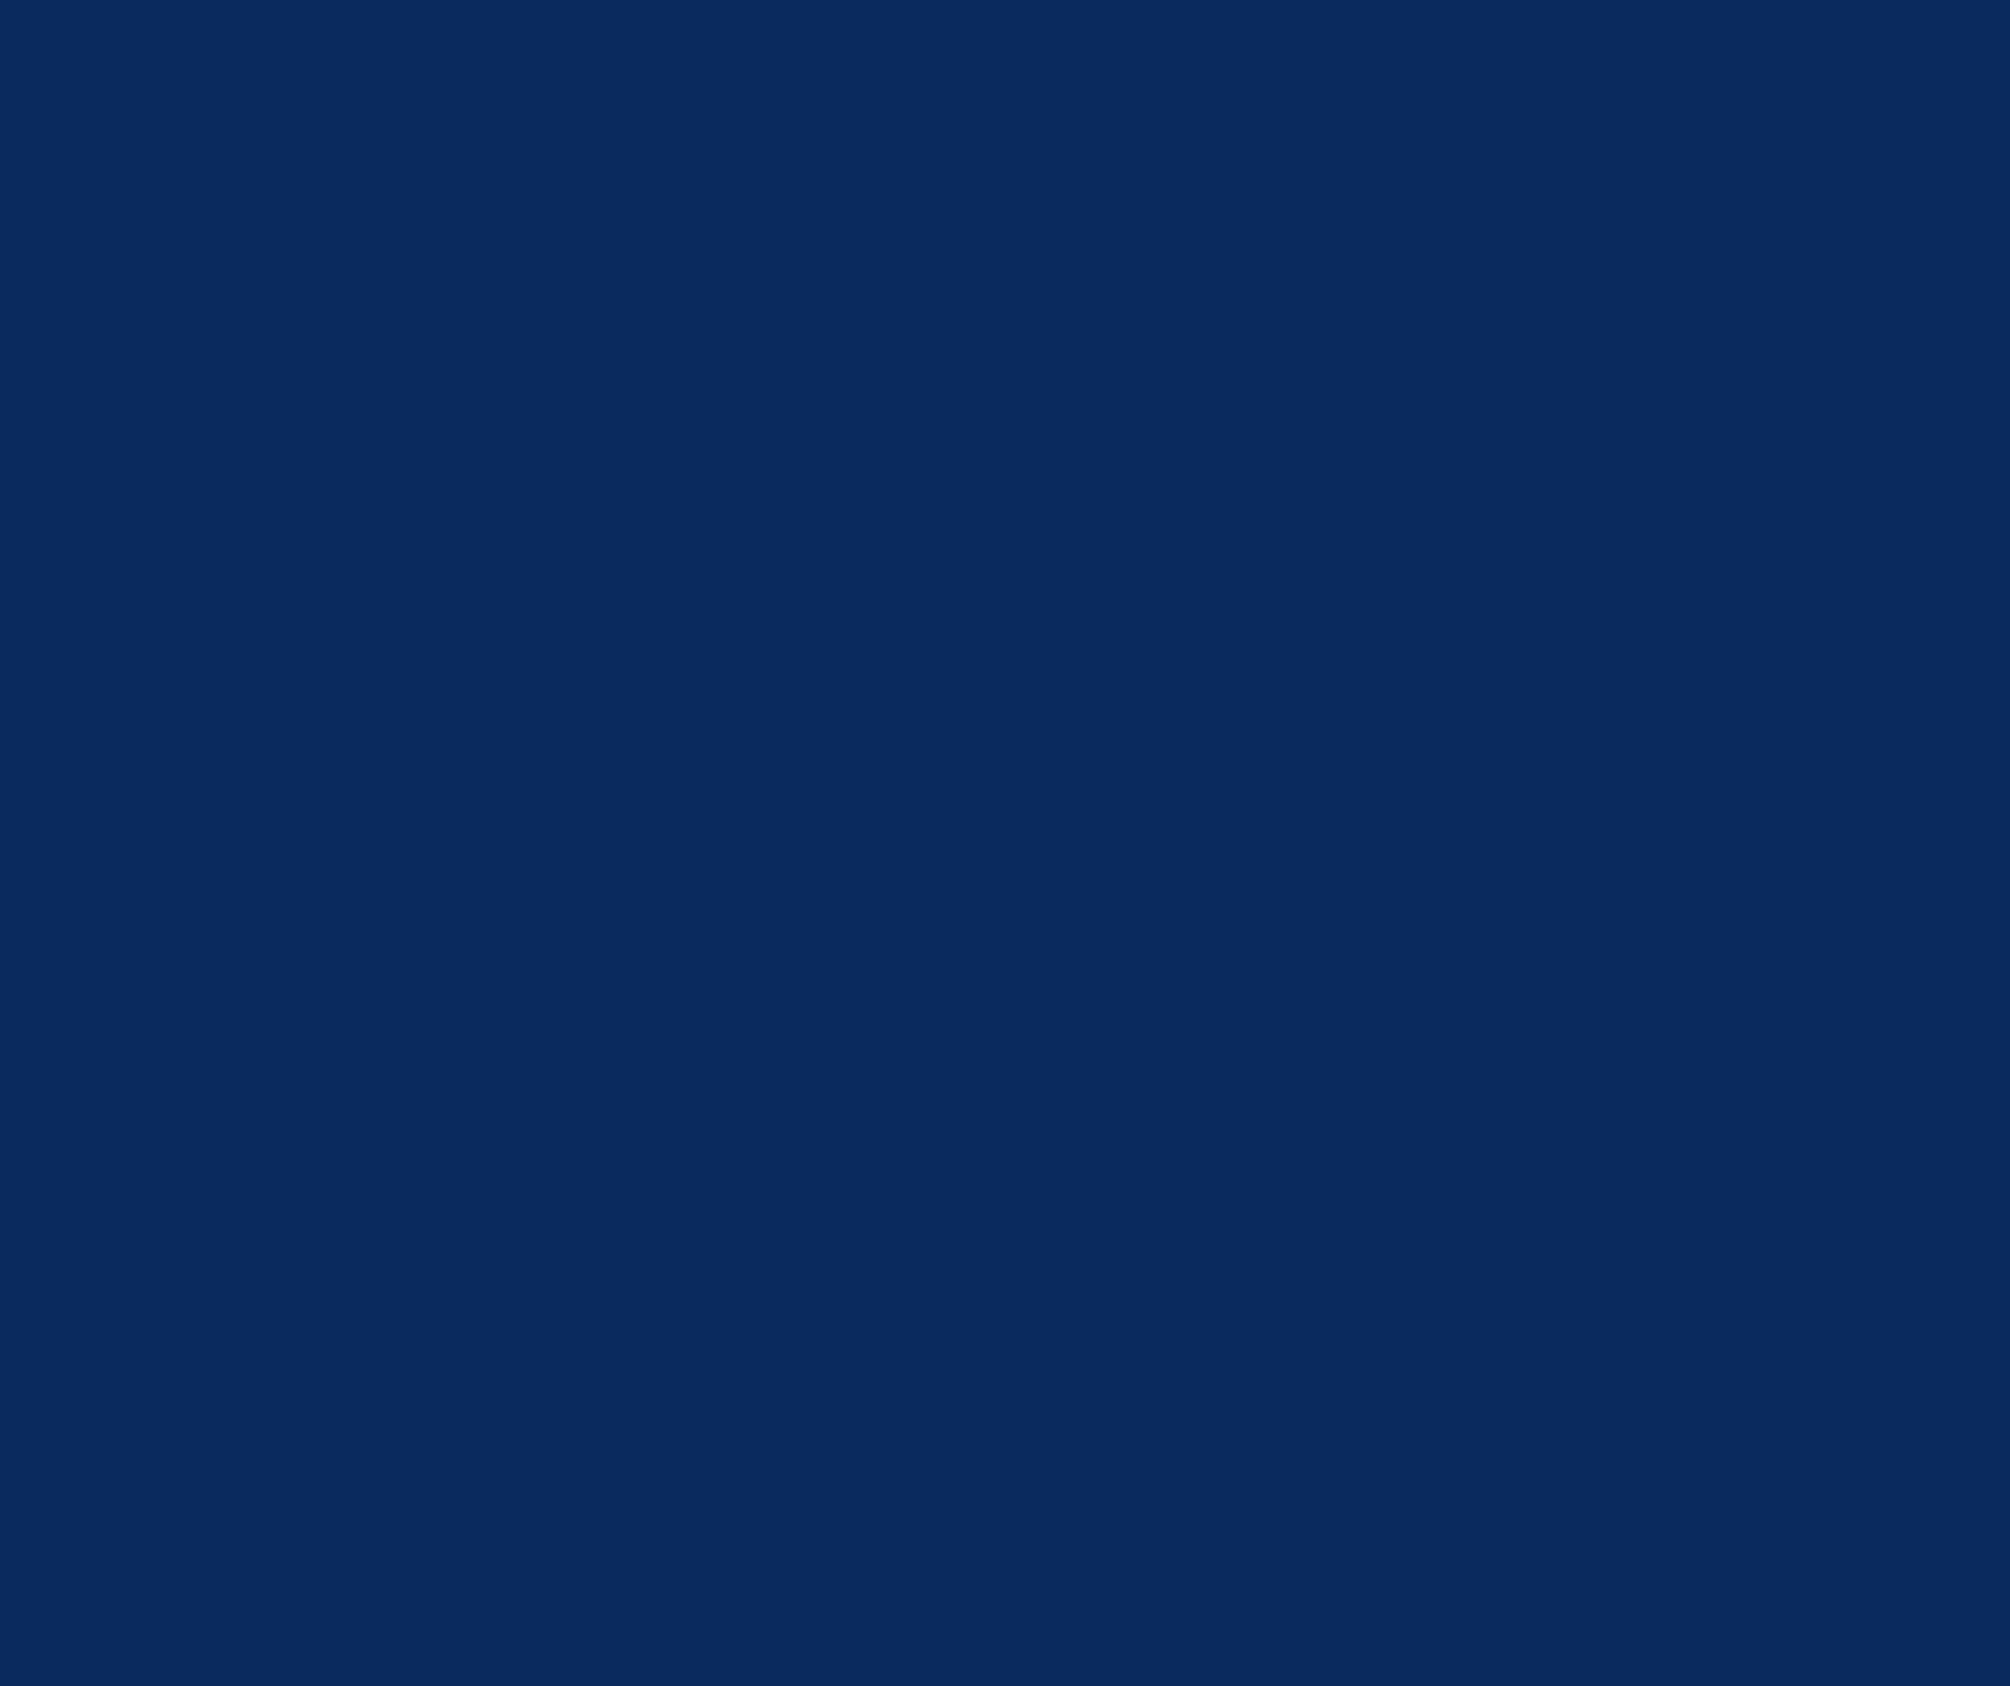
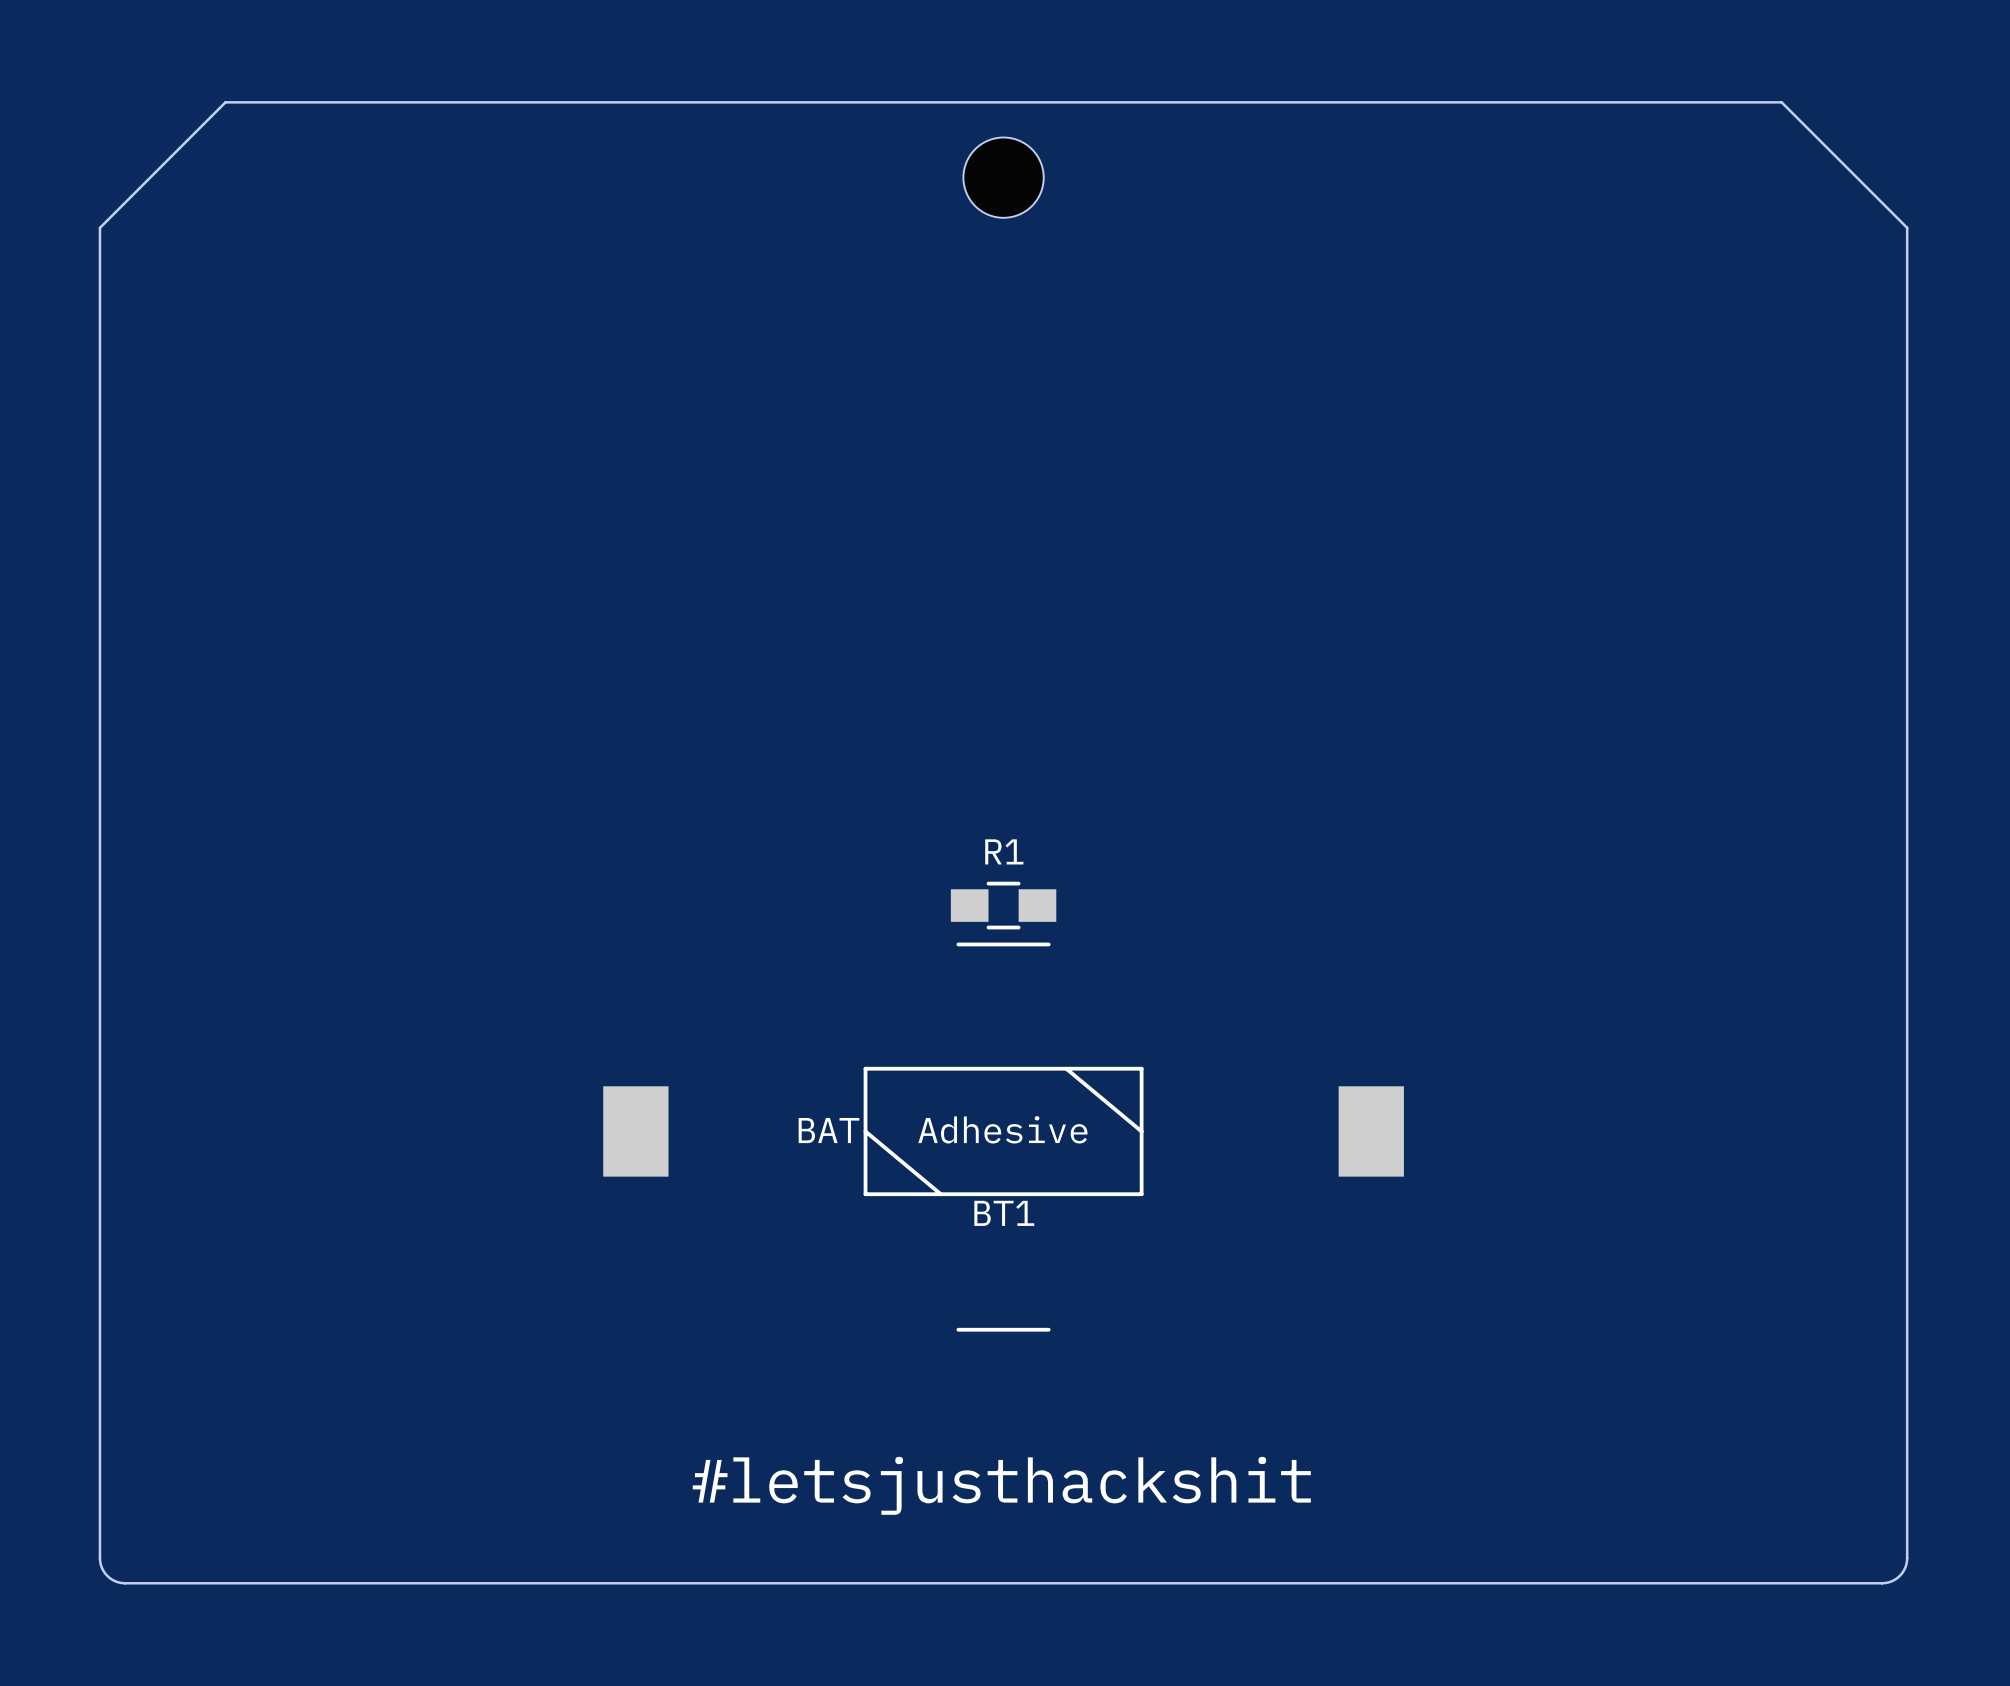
board edge: none -> (1781, 102) (225, 102) (99, 227) (99, 1558) (101, 1567) (107, 1575) (115, 1581) (125, 1583) (1882, 1583) (1891, 1581) (1899, 1575) (1905, 1567) (1907, 1558) (1907, 227) (1781, 102)
part: none -> (1003, 177)
R1: none -> (1003, 905)
BT1: none -> (1003, 1137)
text: none -> #letsjusthackshit (1001, 1485)

